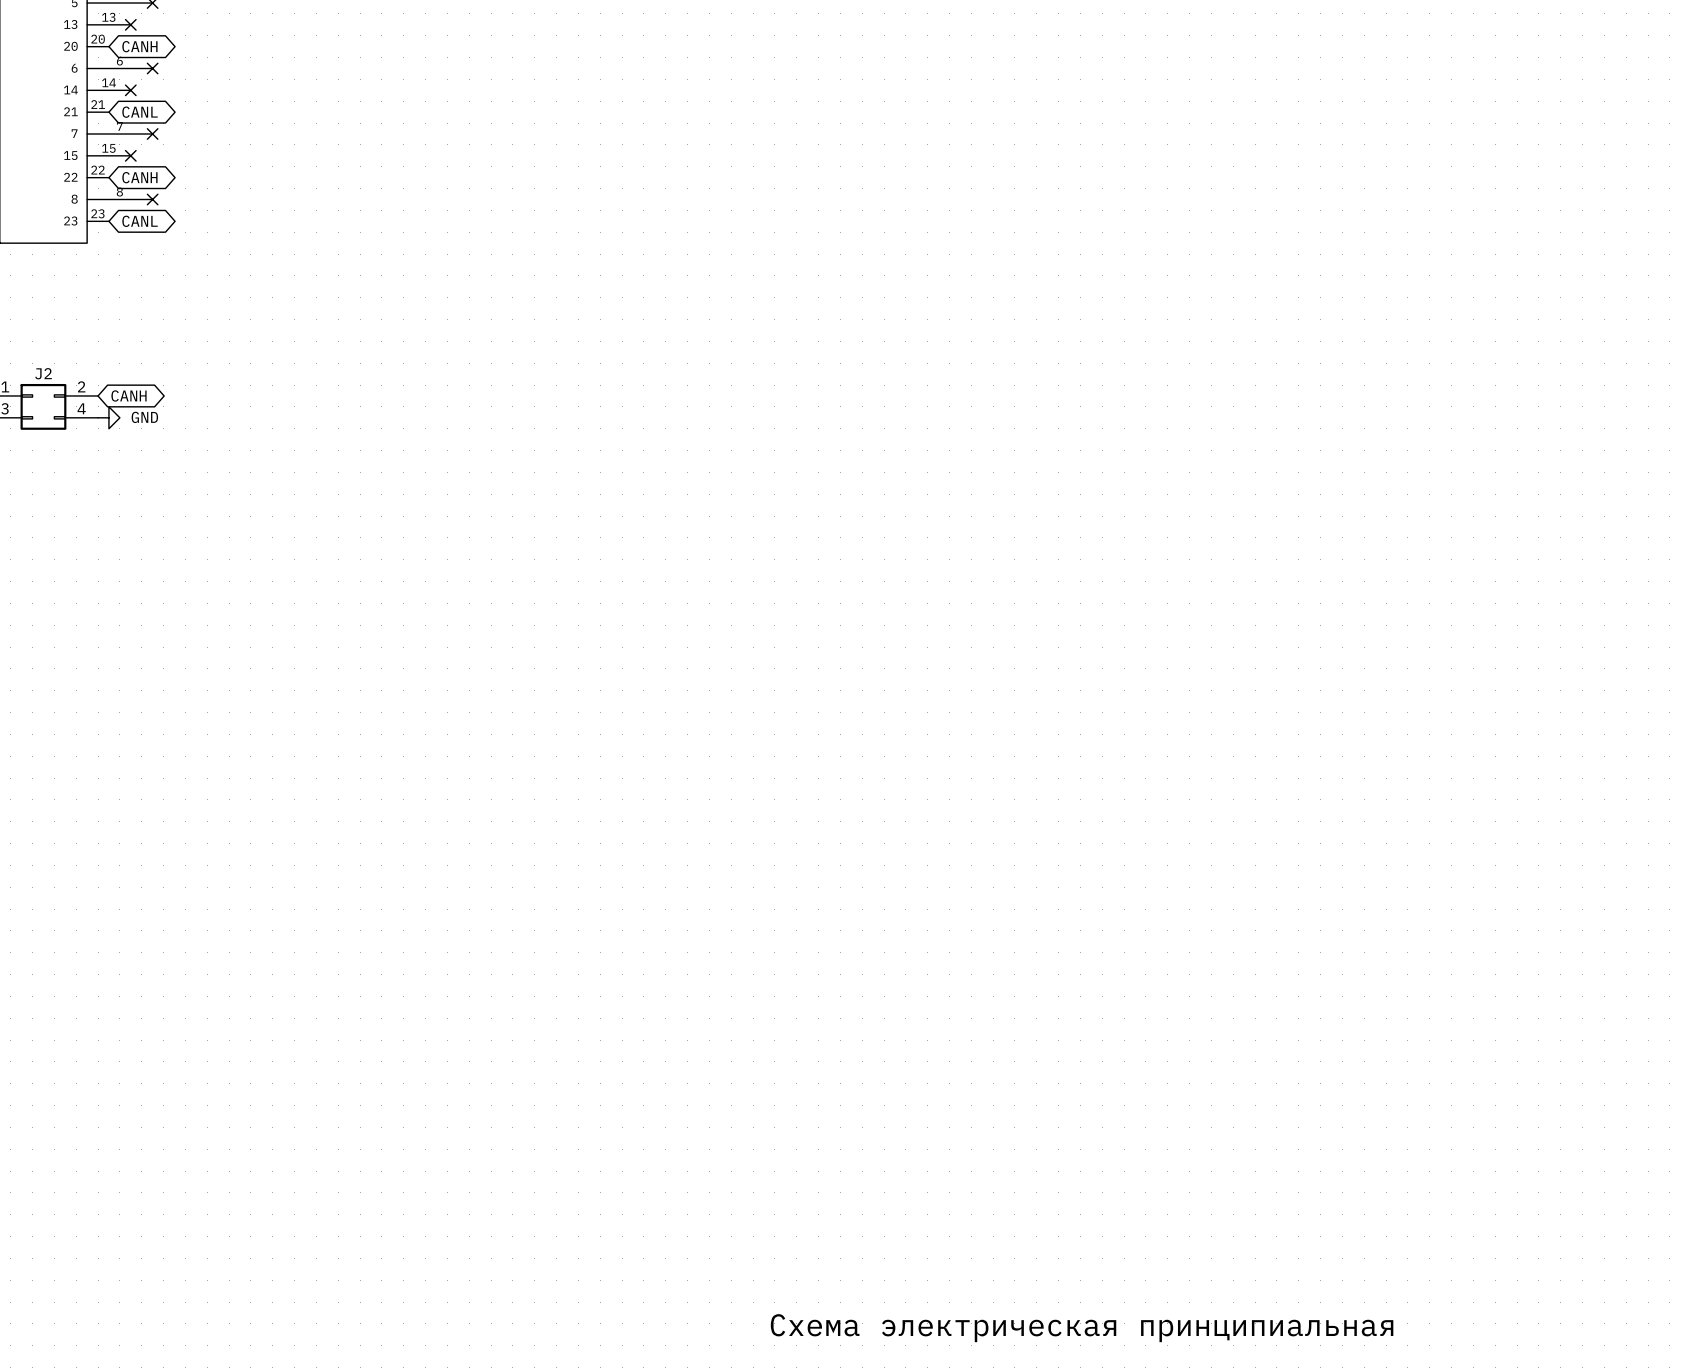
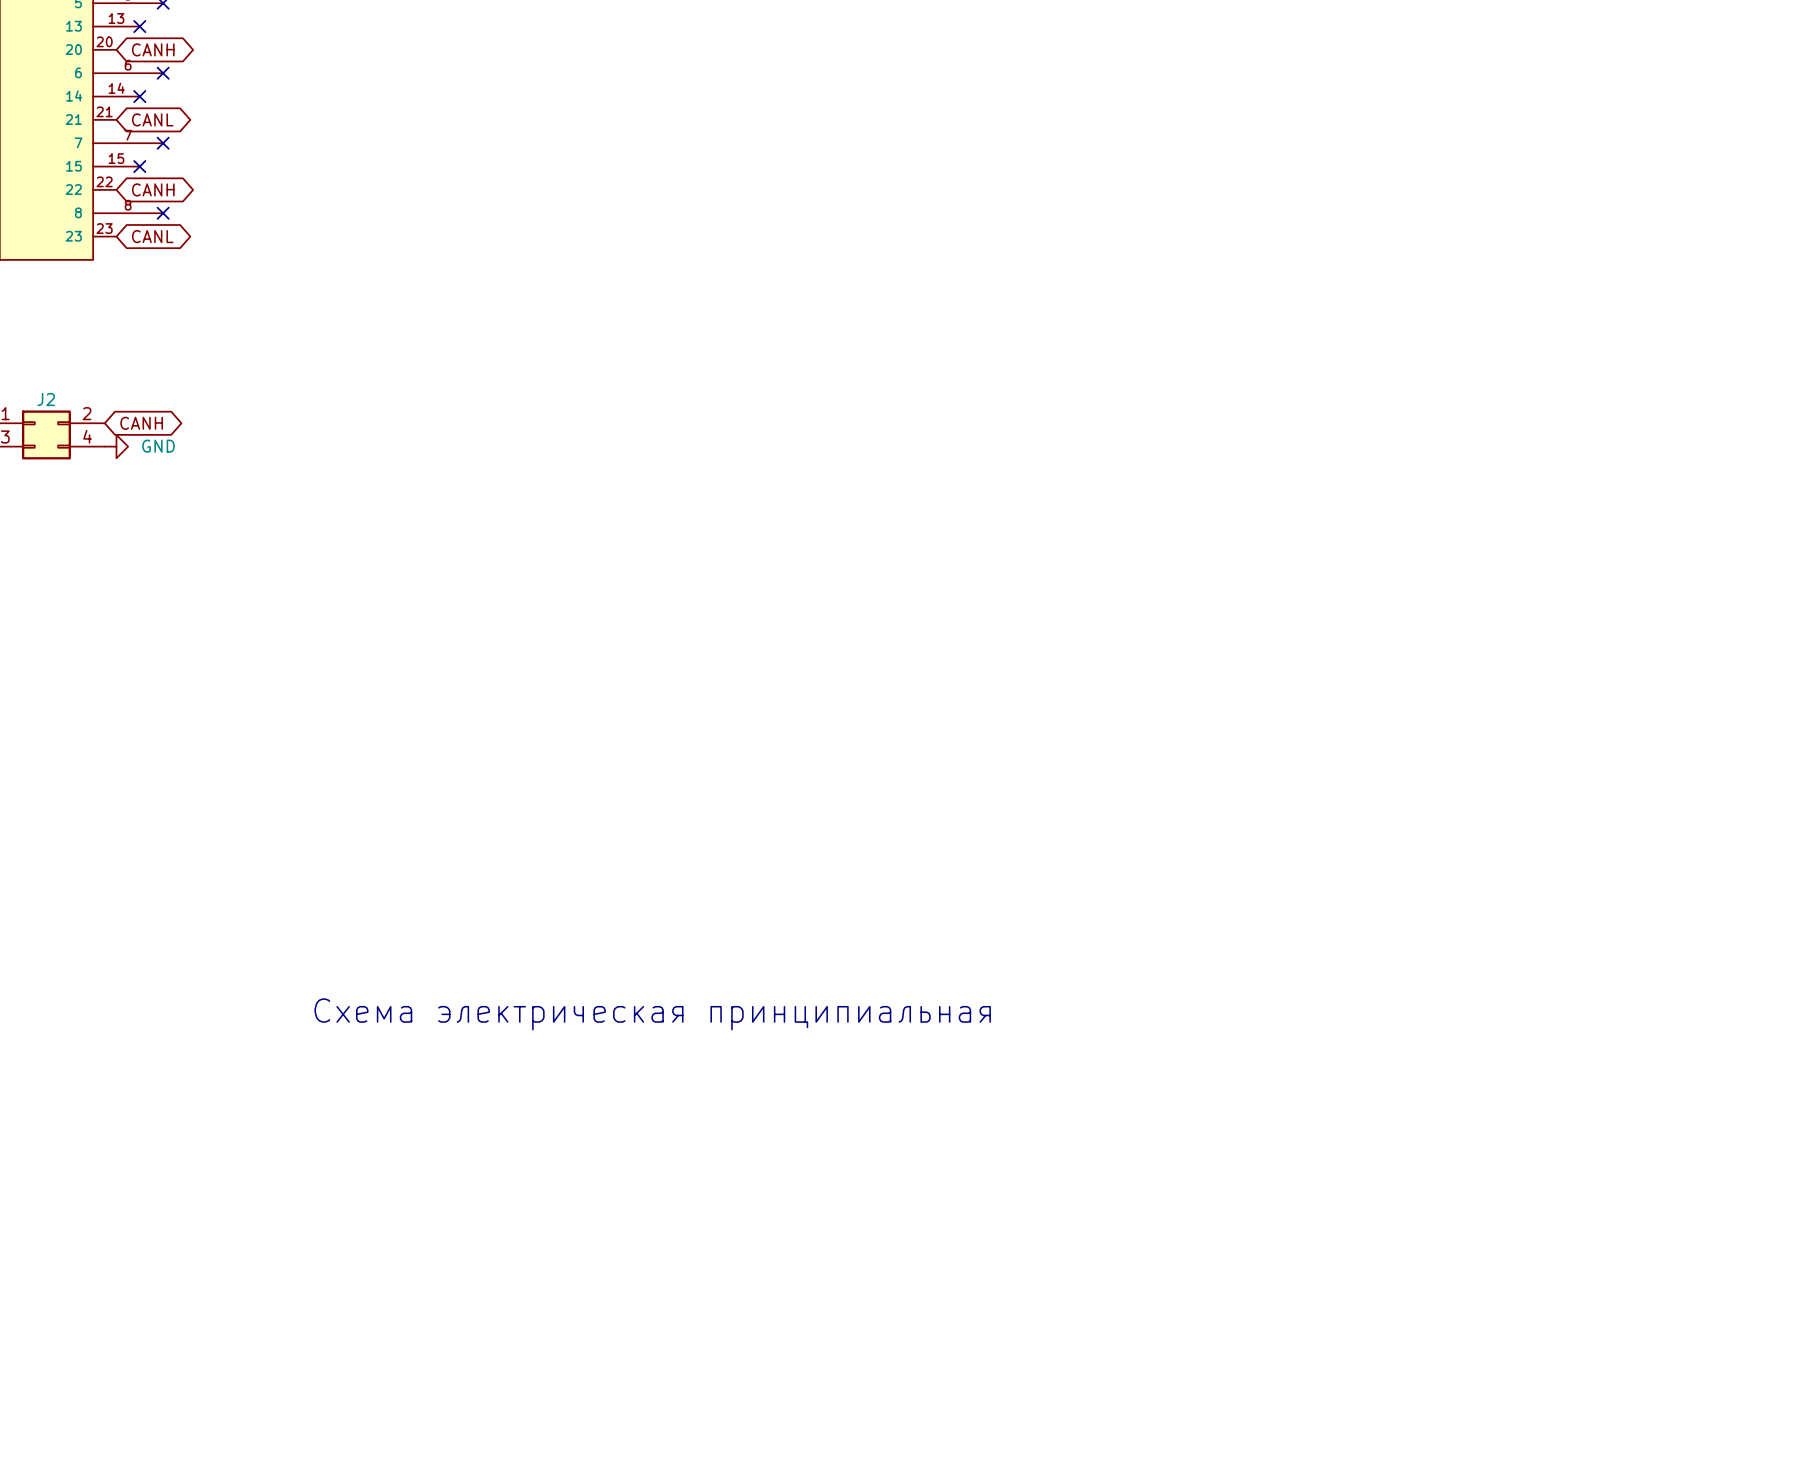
text: none -> Схема электрическая принципиальная (652, 1014)
text: Схема электрическая принципиальная (1082, 1328) -> none

